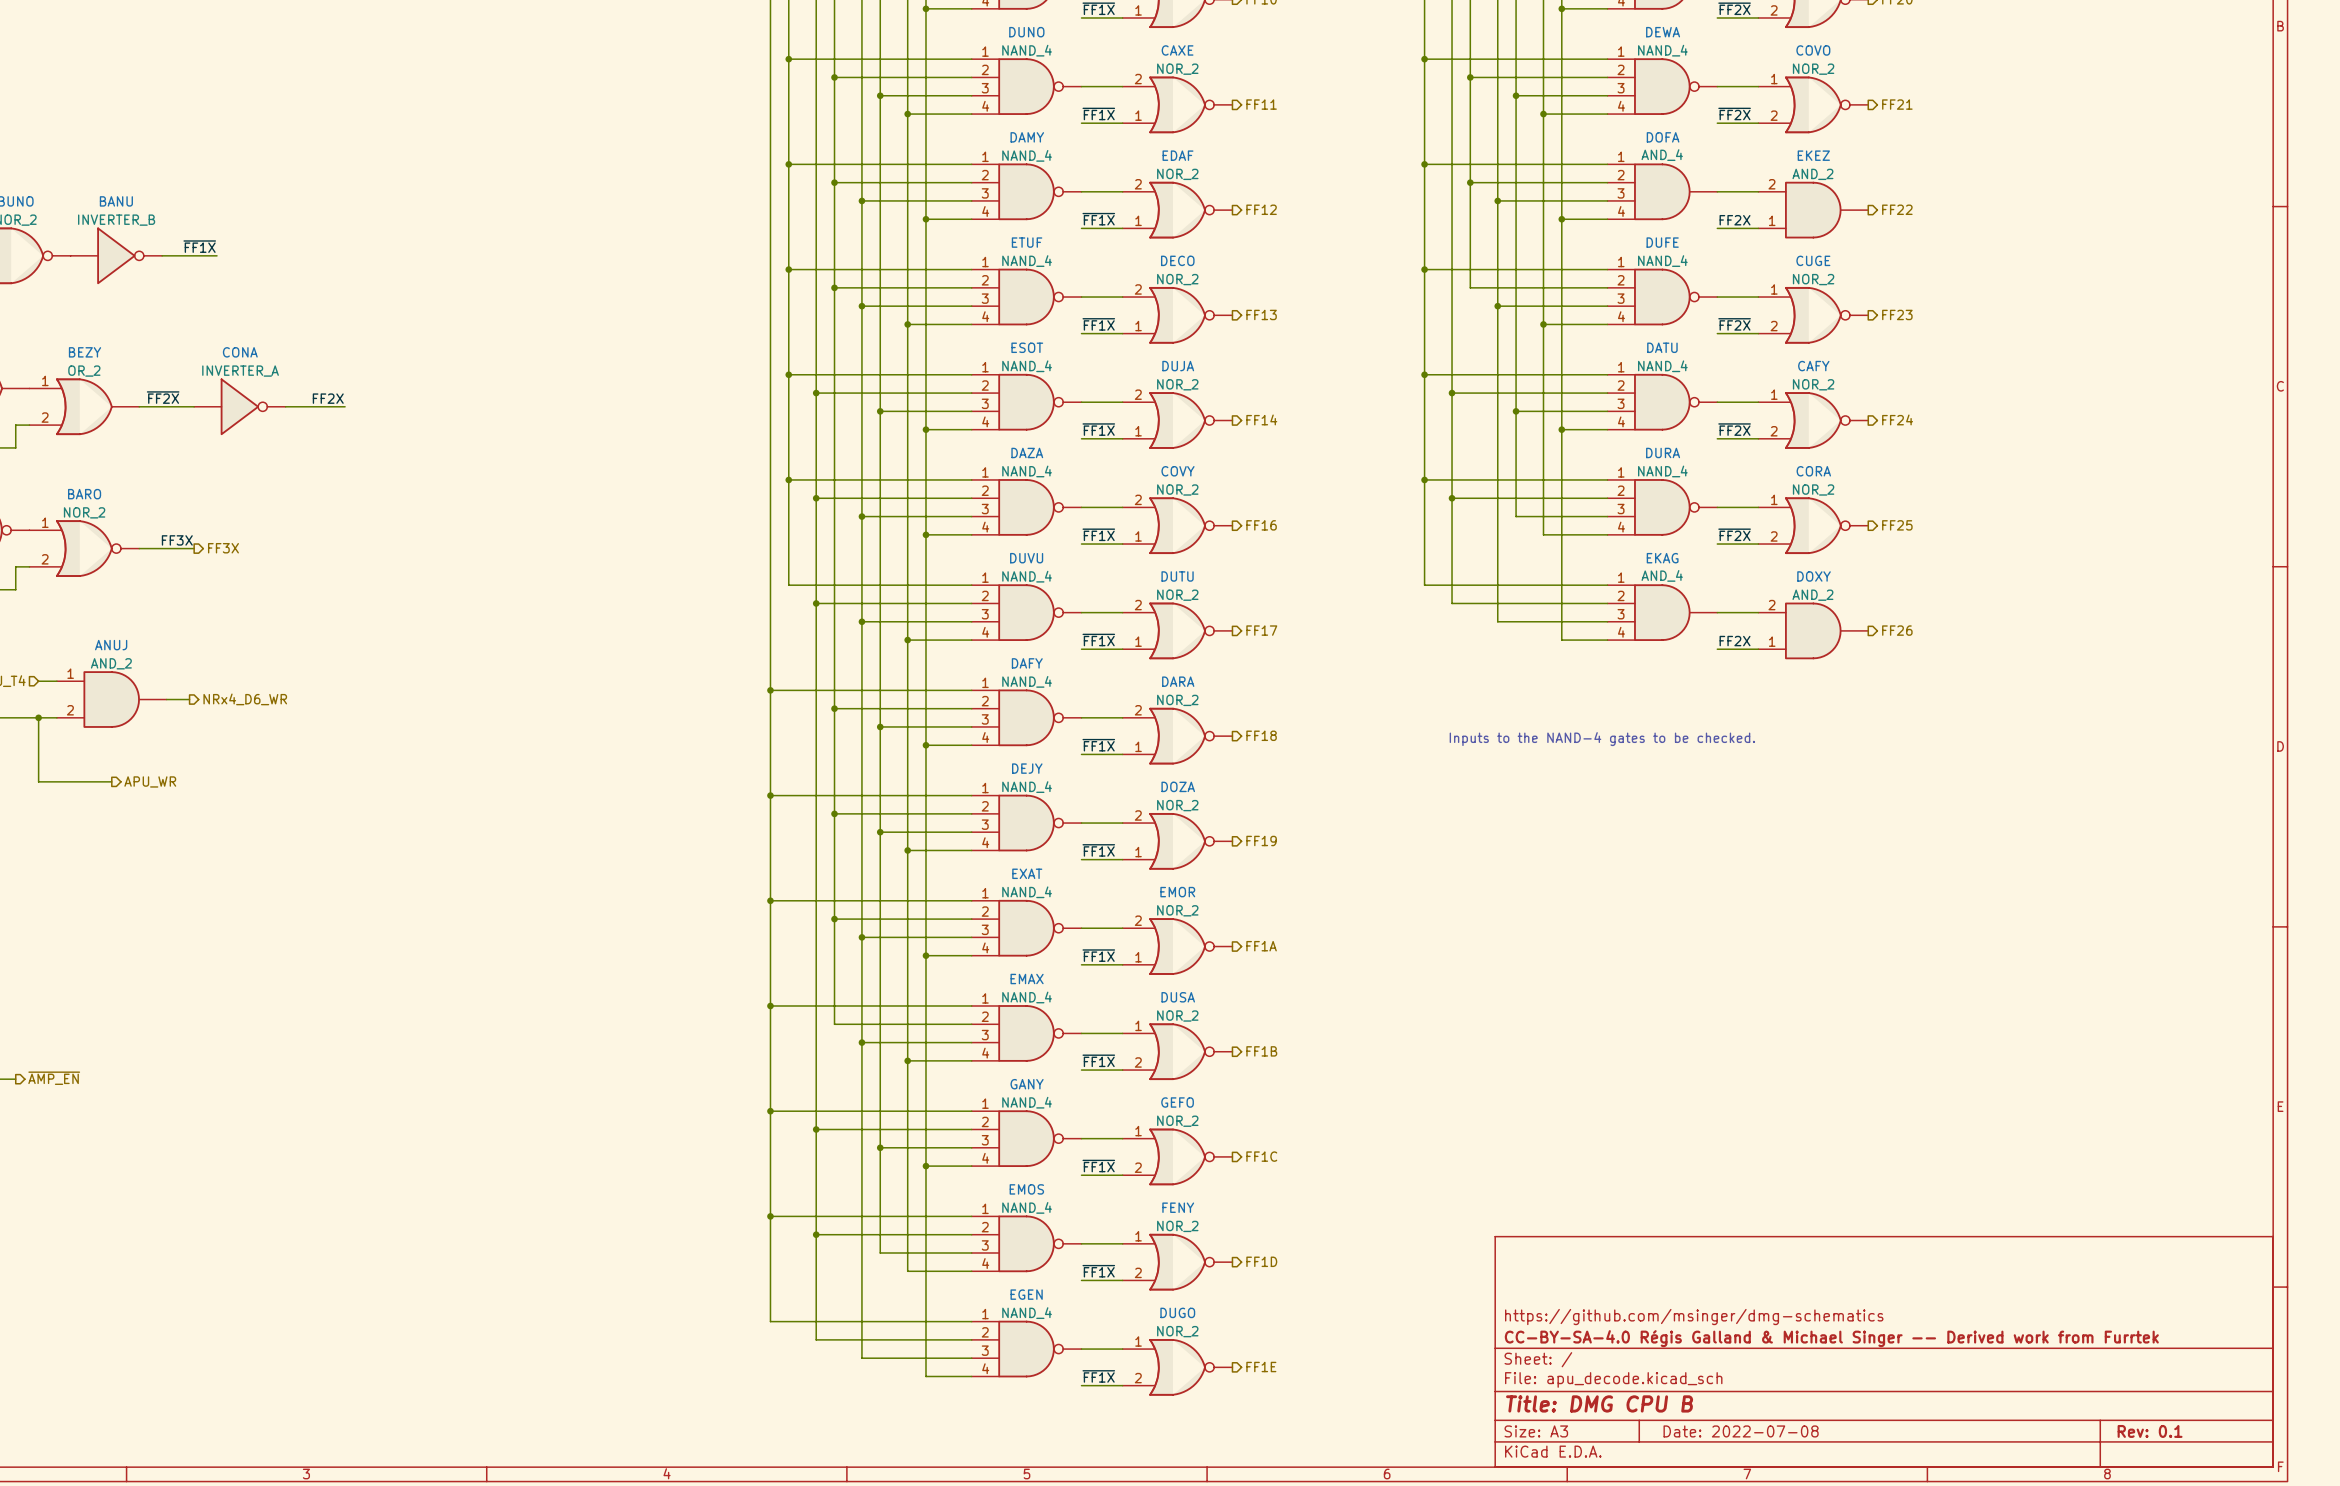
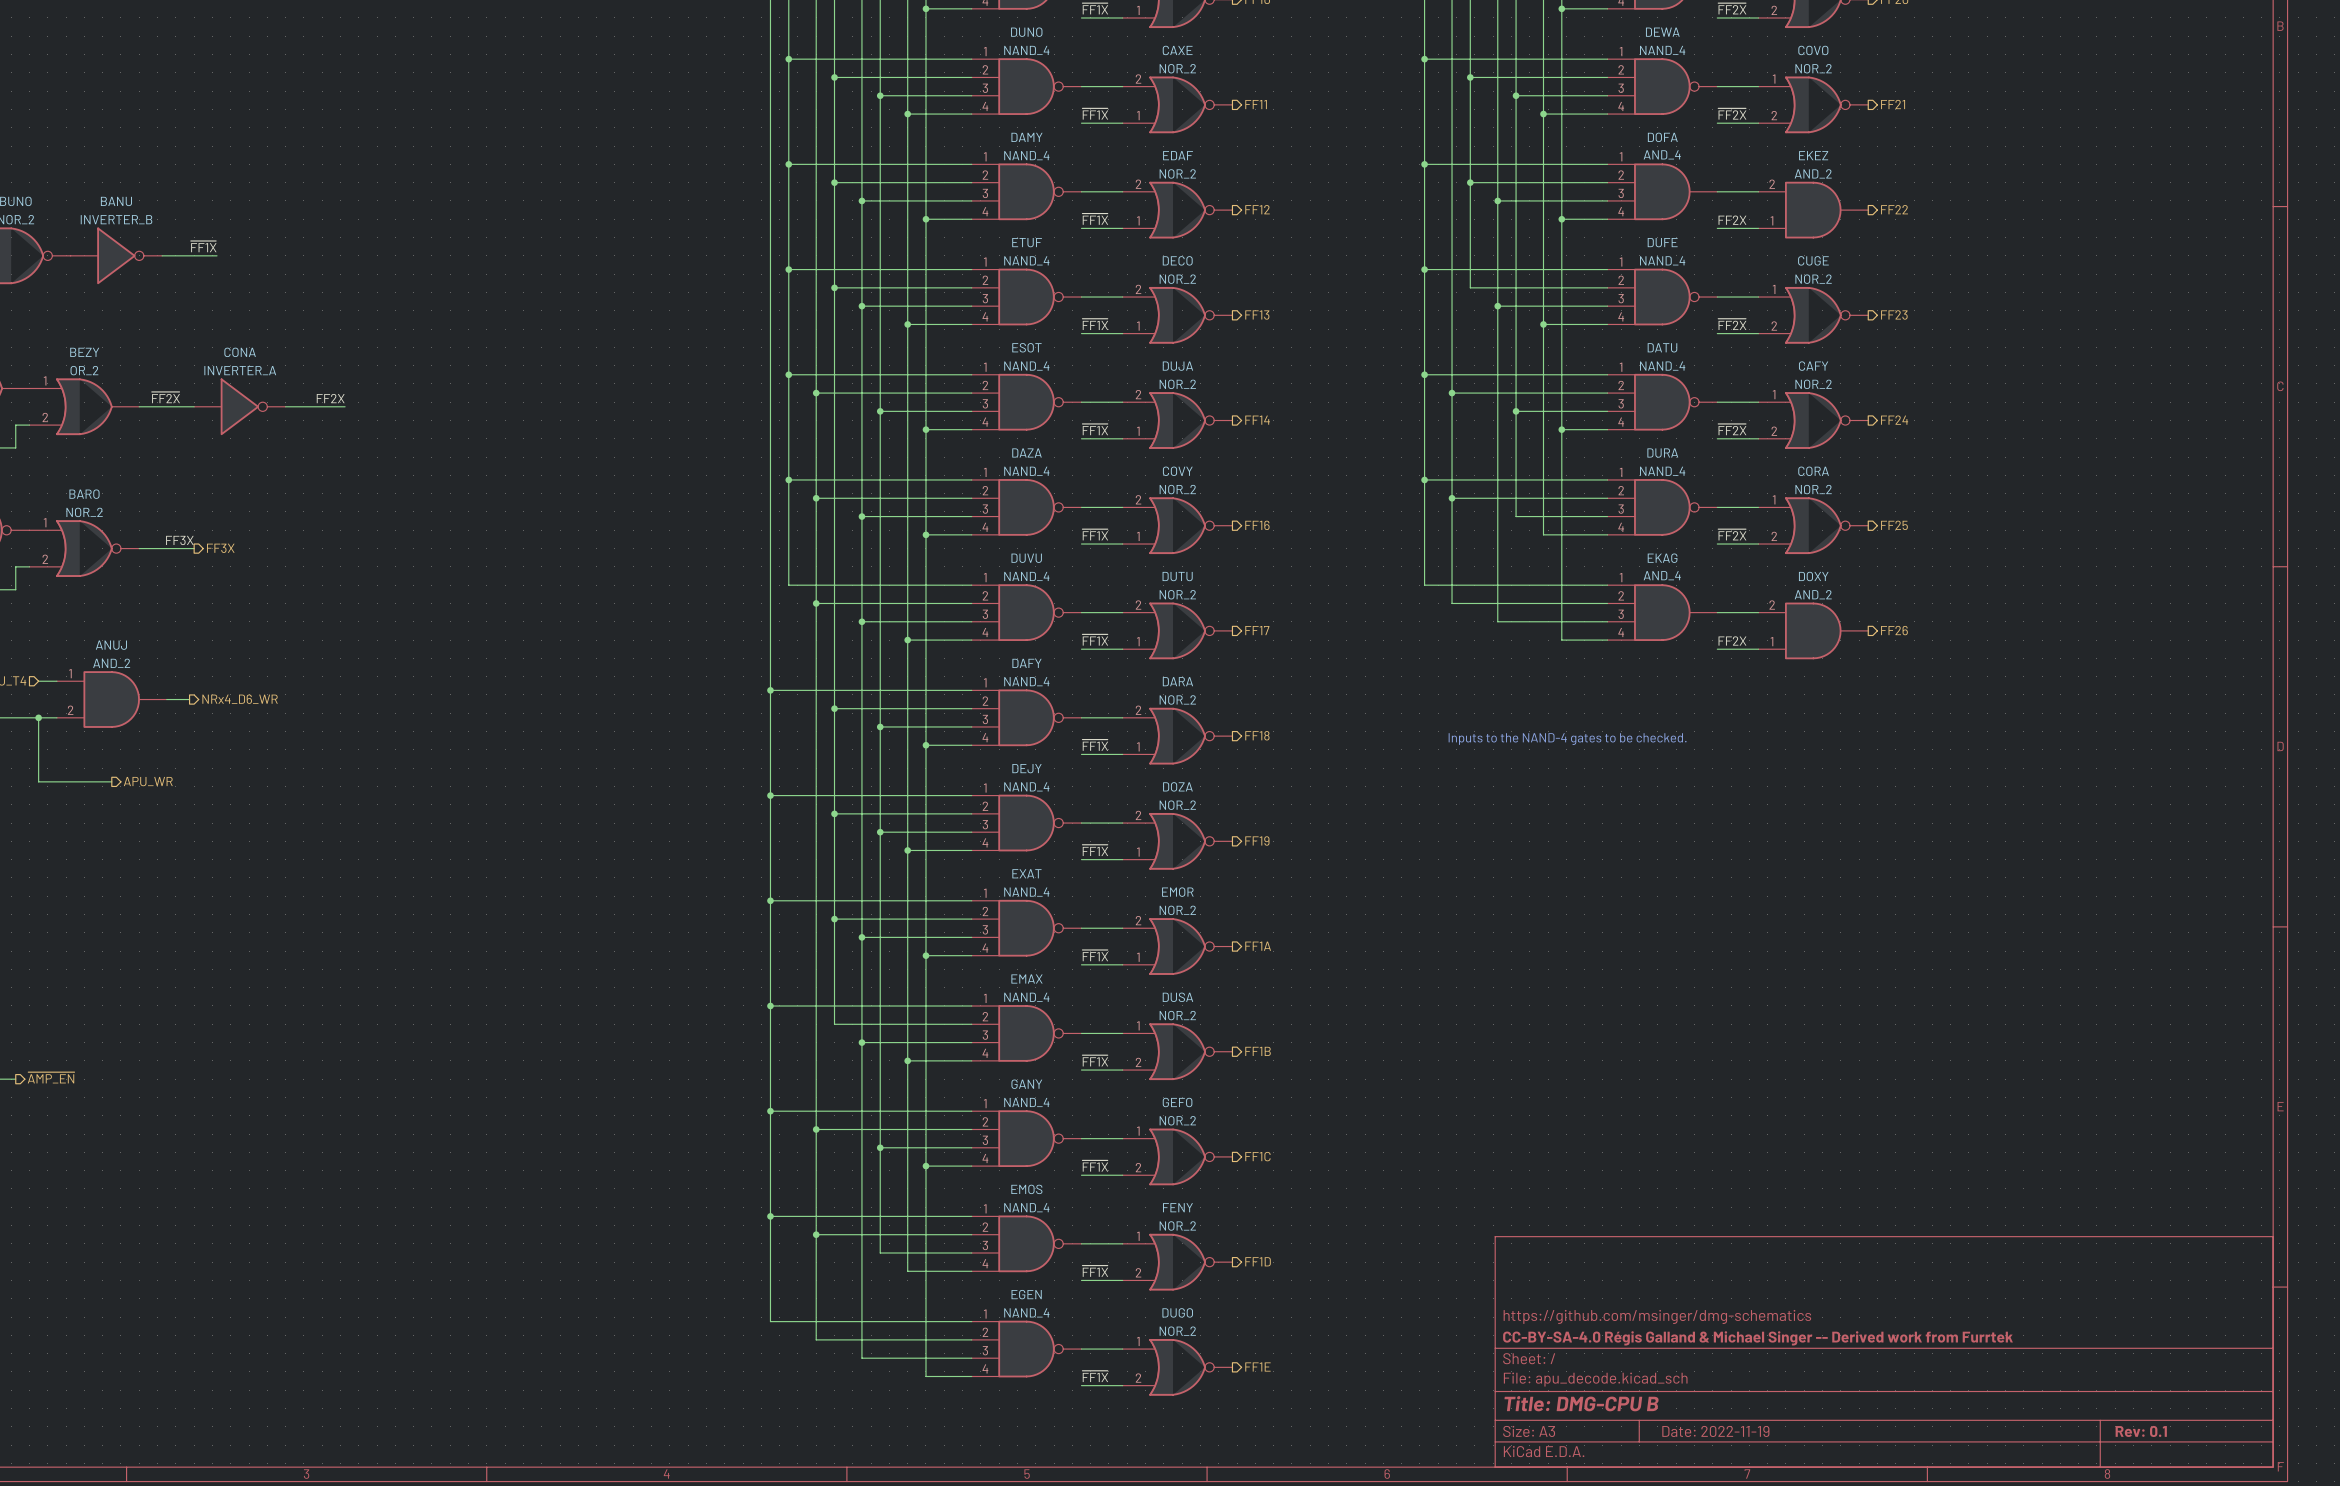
title block: Title: DMG CPU B (1599, 1403) -> Title: DMG-CPU B (1581, 1403)
title block: Date: 2022-07-08 (1741, 1431) -> Date: 2022-11-19 (1715, 1431)

